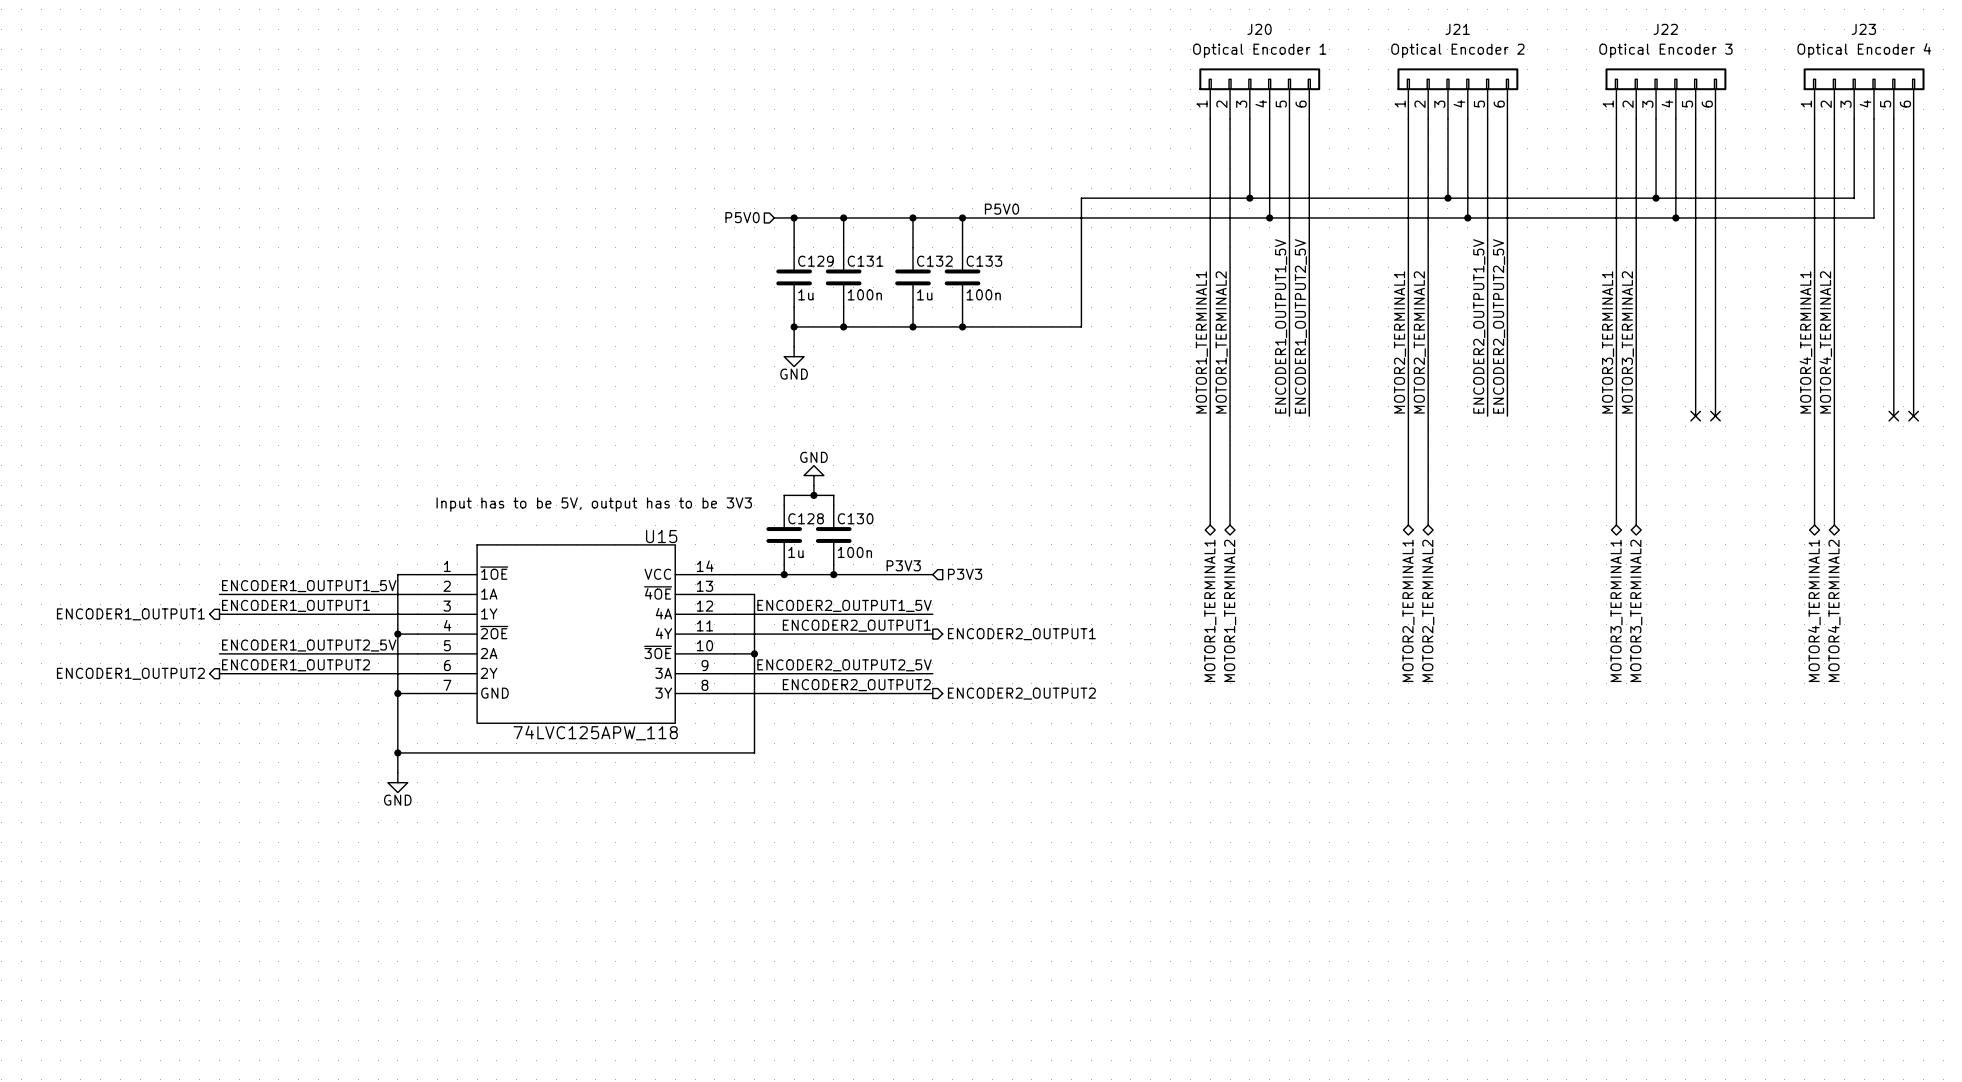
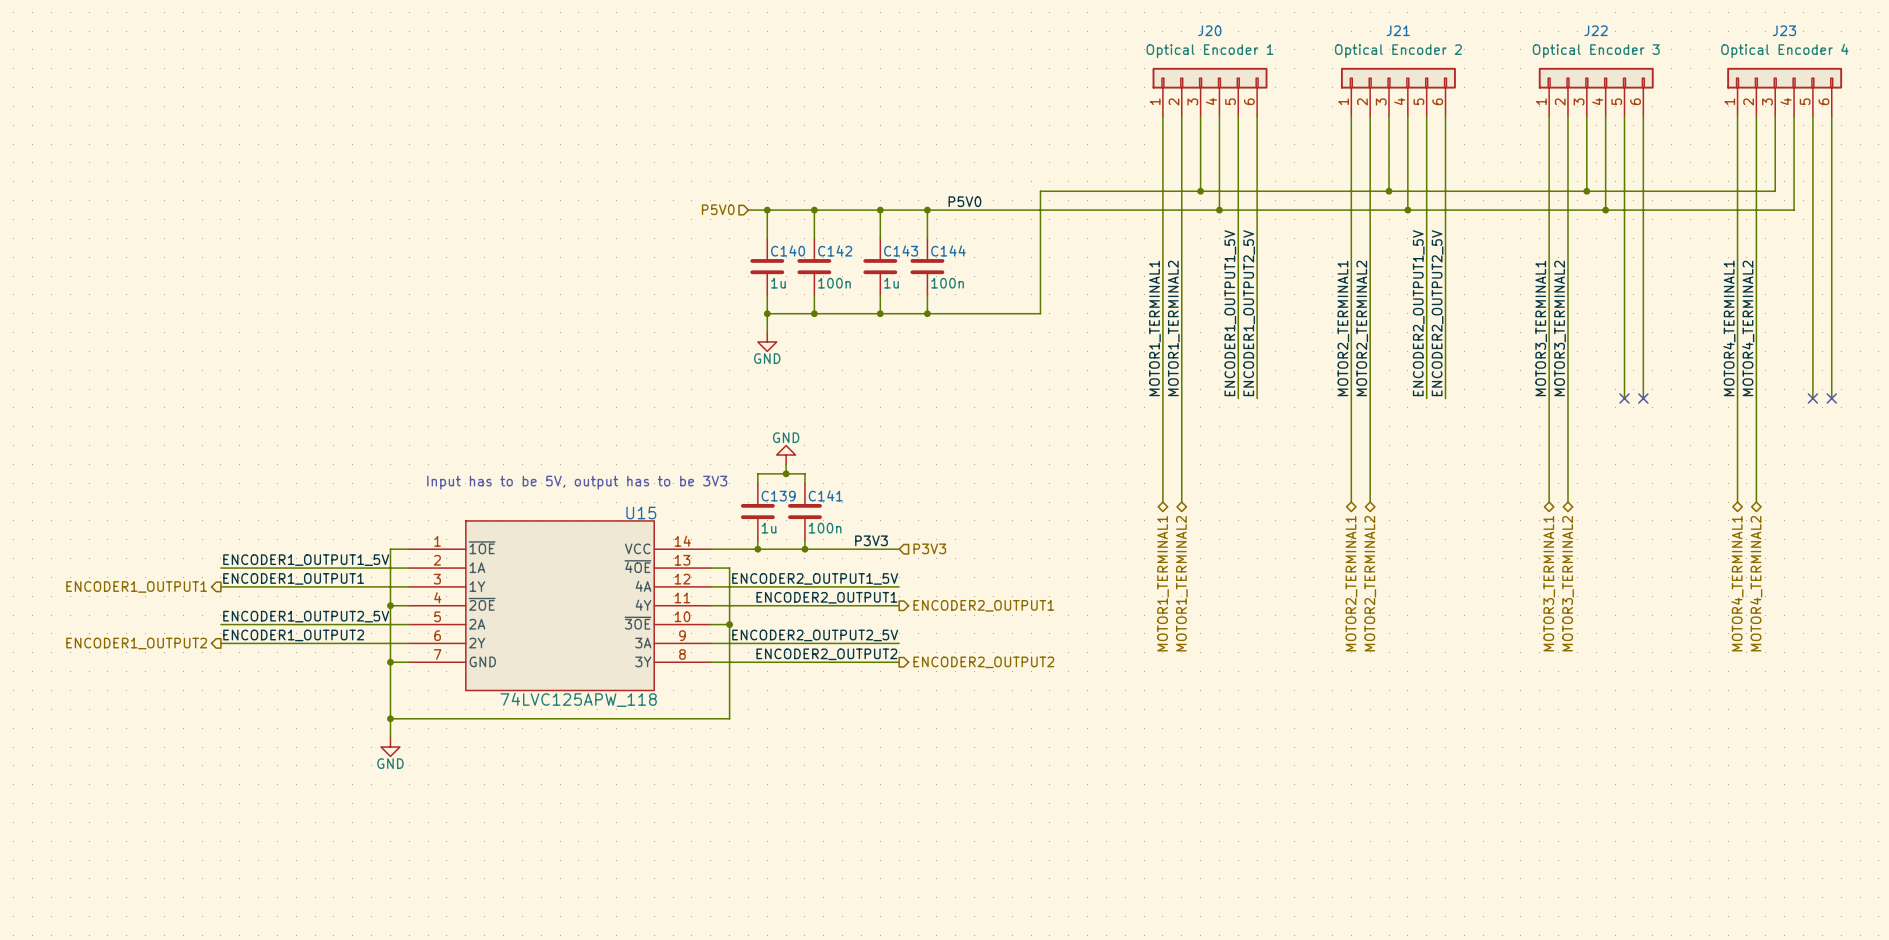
C129 name: C129 (815, 261) -> C140 (788, 250)
C131 name: C131 (865, 261) -> C142 (835, 250)
C132 name: C132 (934, 261) -> C143 (901, 250)
C133 name: C133 (984, 261) -> C144 (948, 250)
C128 name: C128 (806, 518) -> C139 (778, 496)
C130 name: C130 (855, 518) -> C141 (825, 495)

